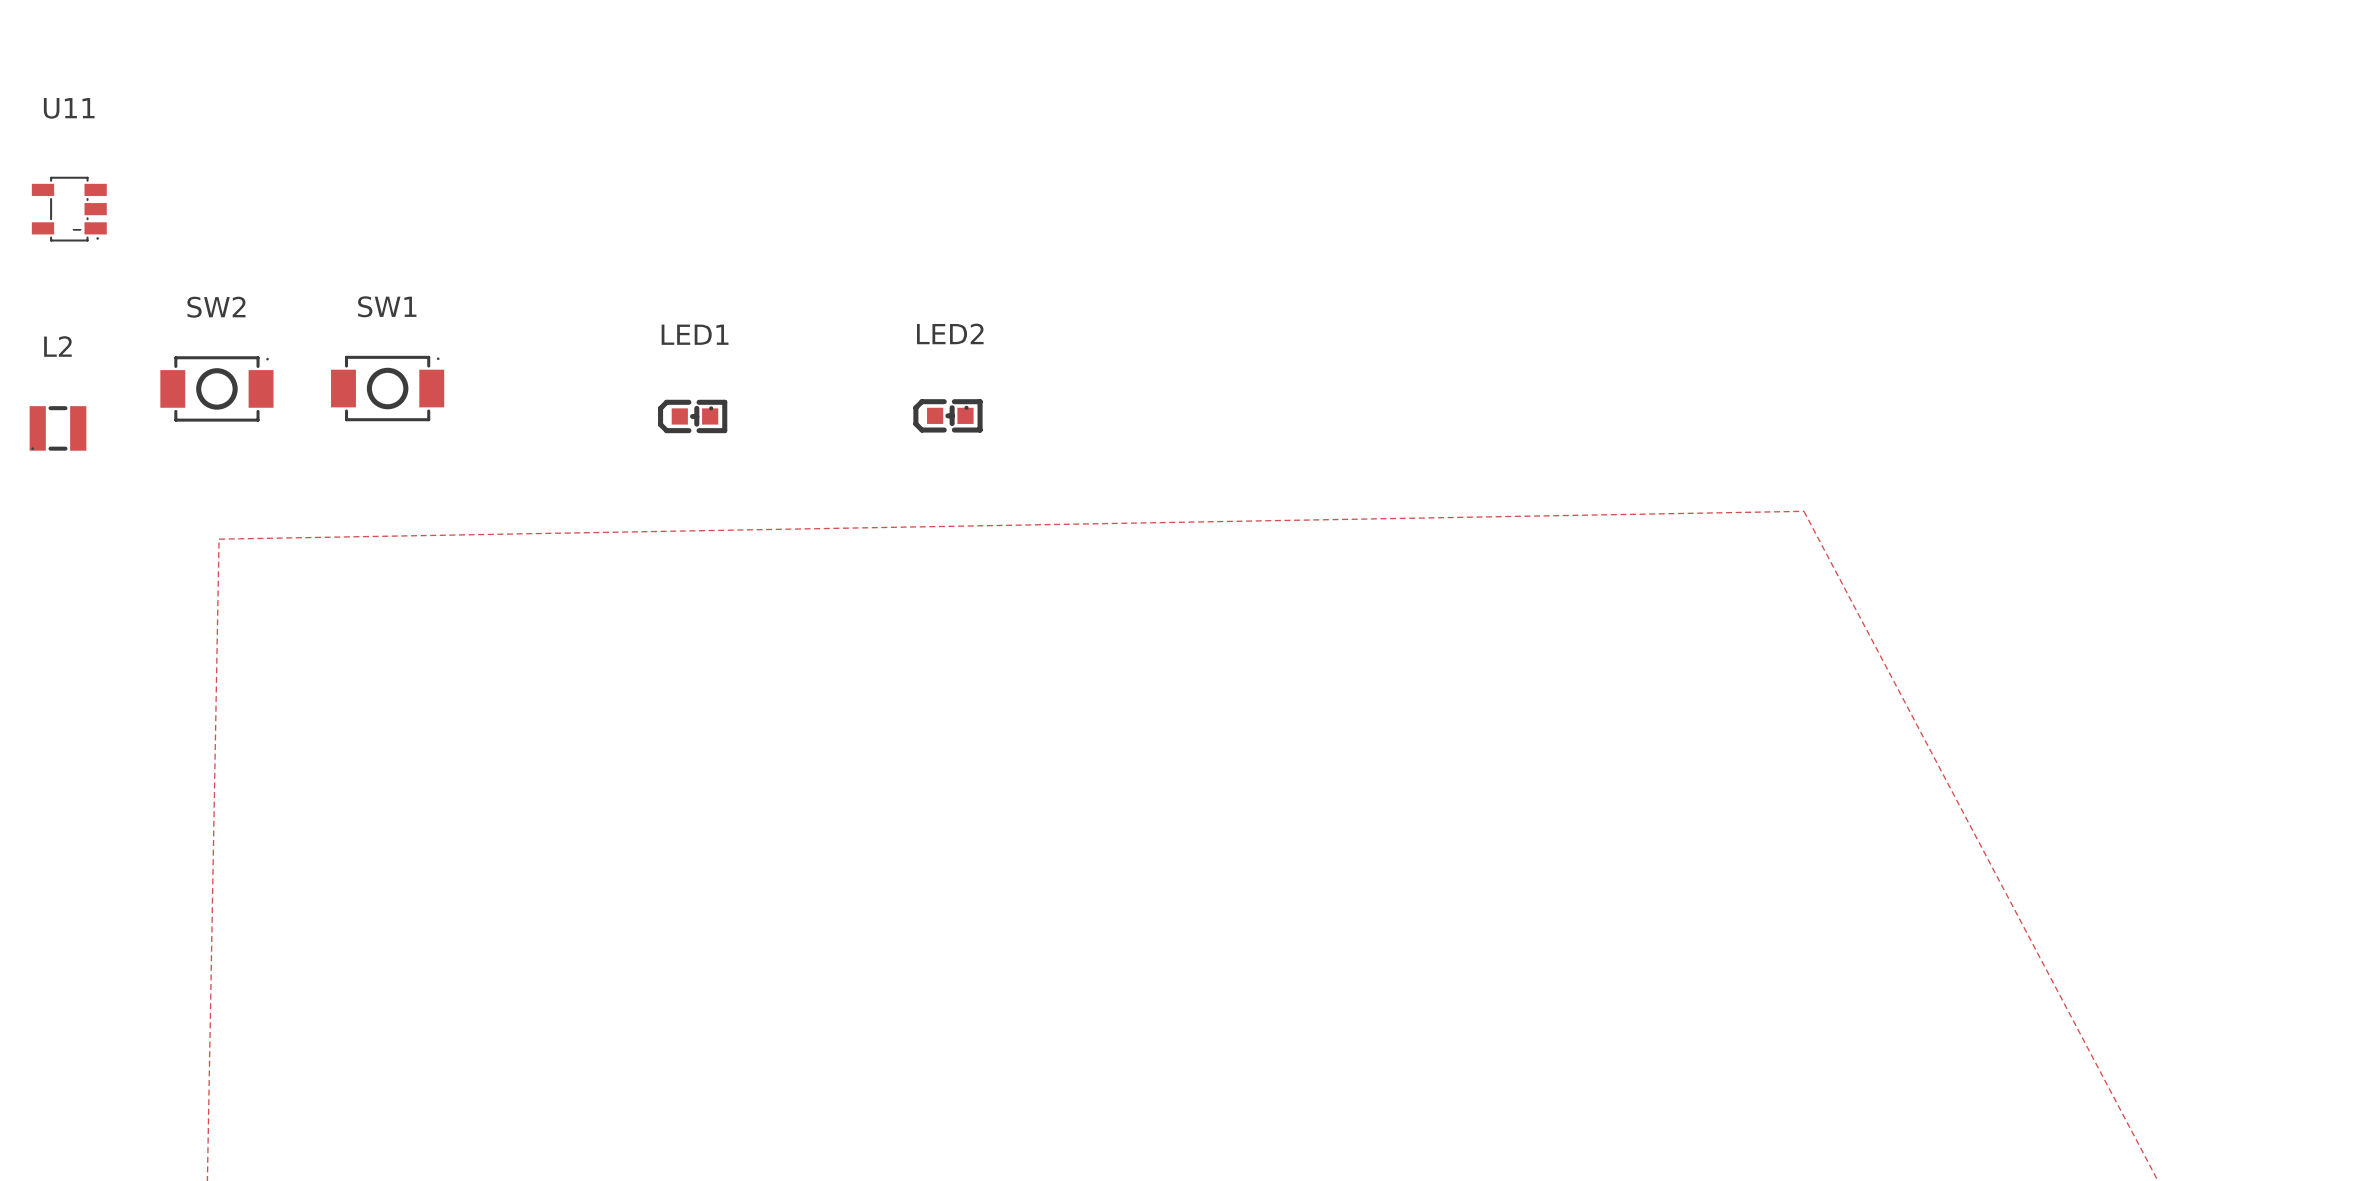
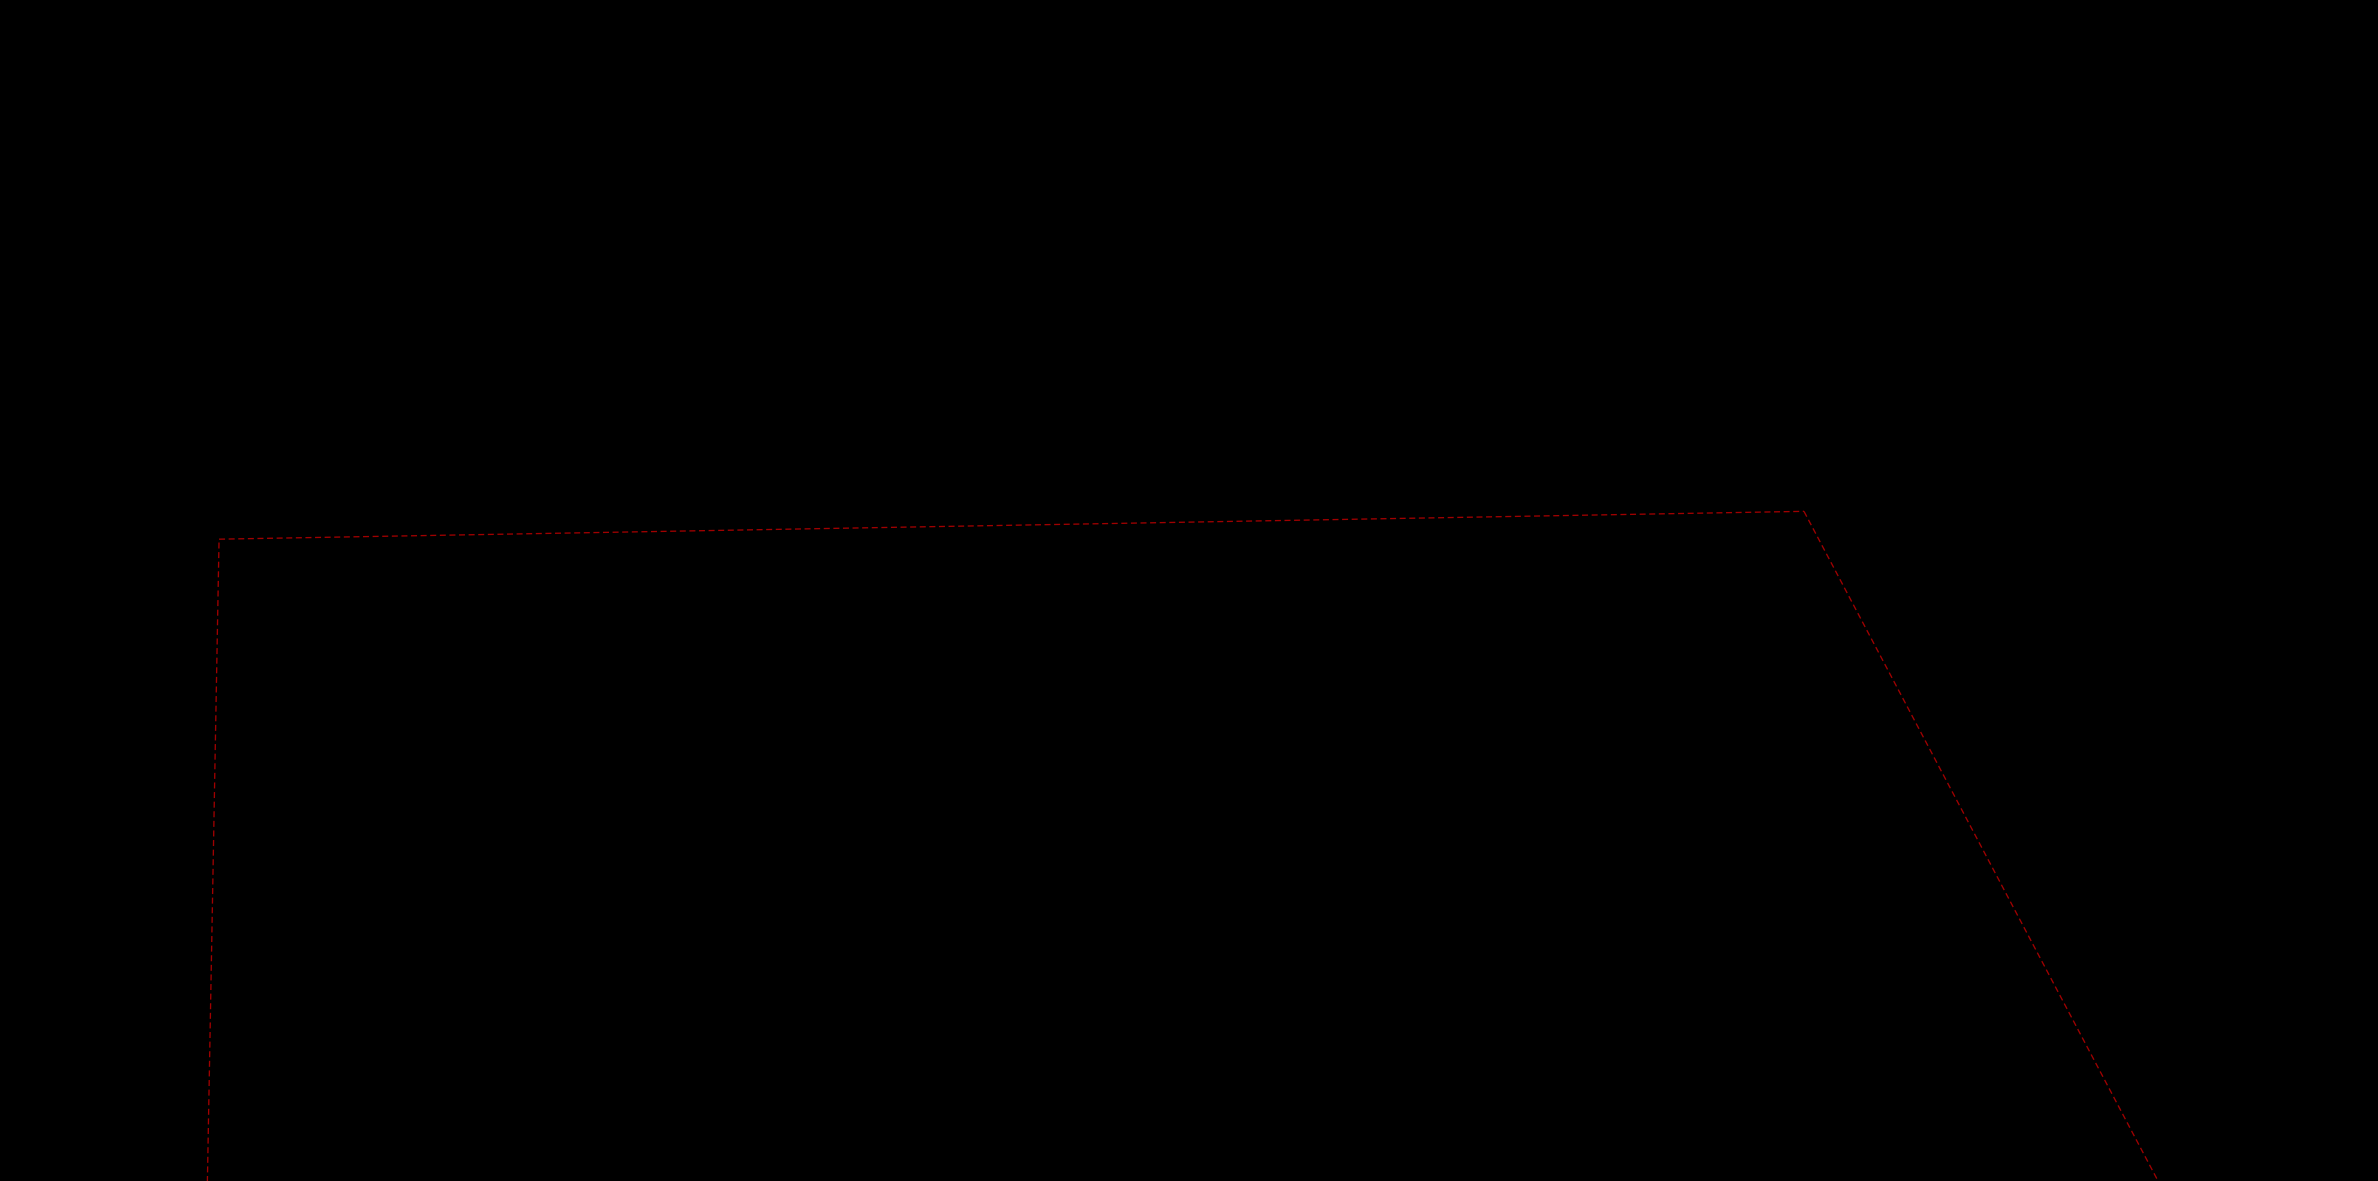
U11: (69, 209) -> none
SW2: (216, 388) -> none
SW1: (387, 388) -> none
LED2: (947, 415) -> none
LED1: (692, 416) -> none
L2: (57, 428) -> none

